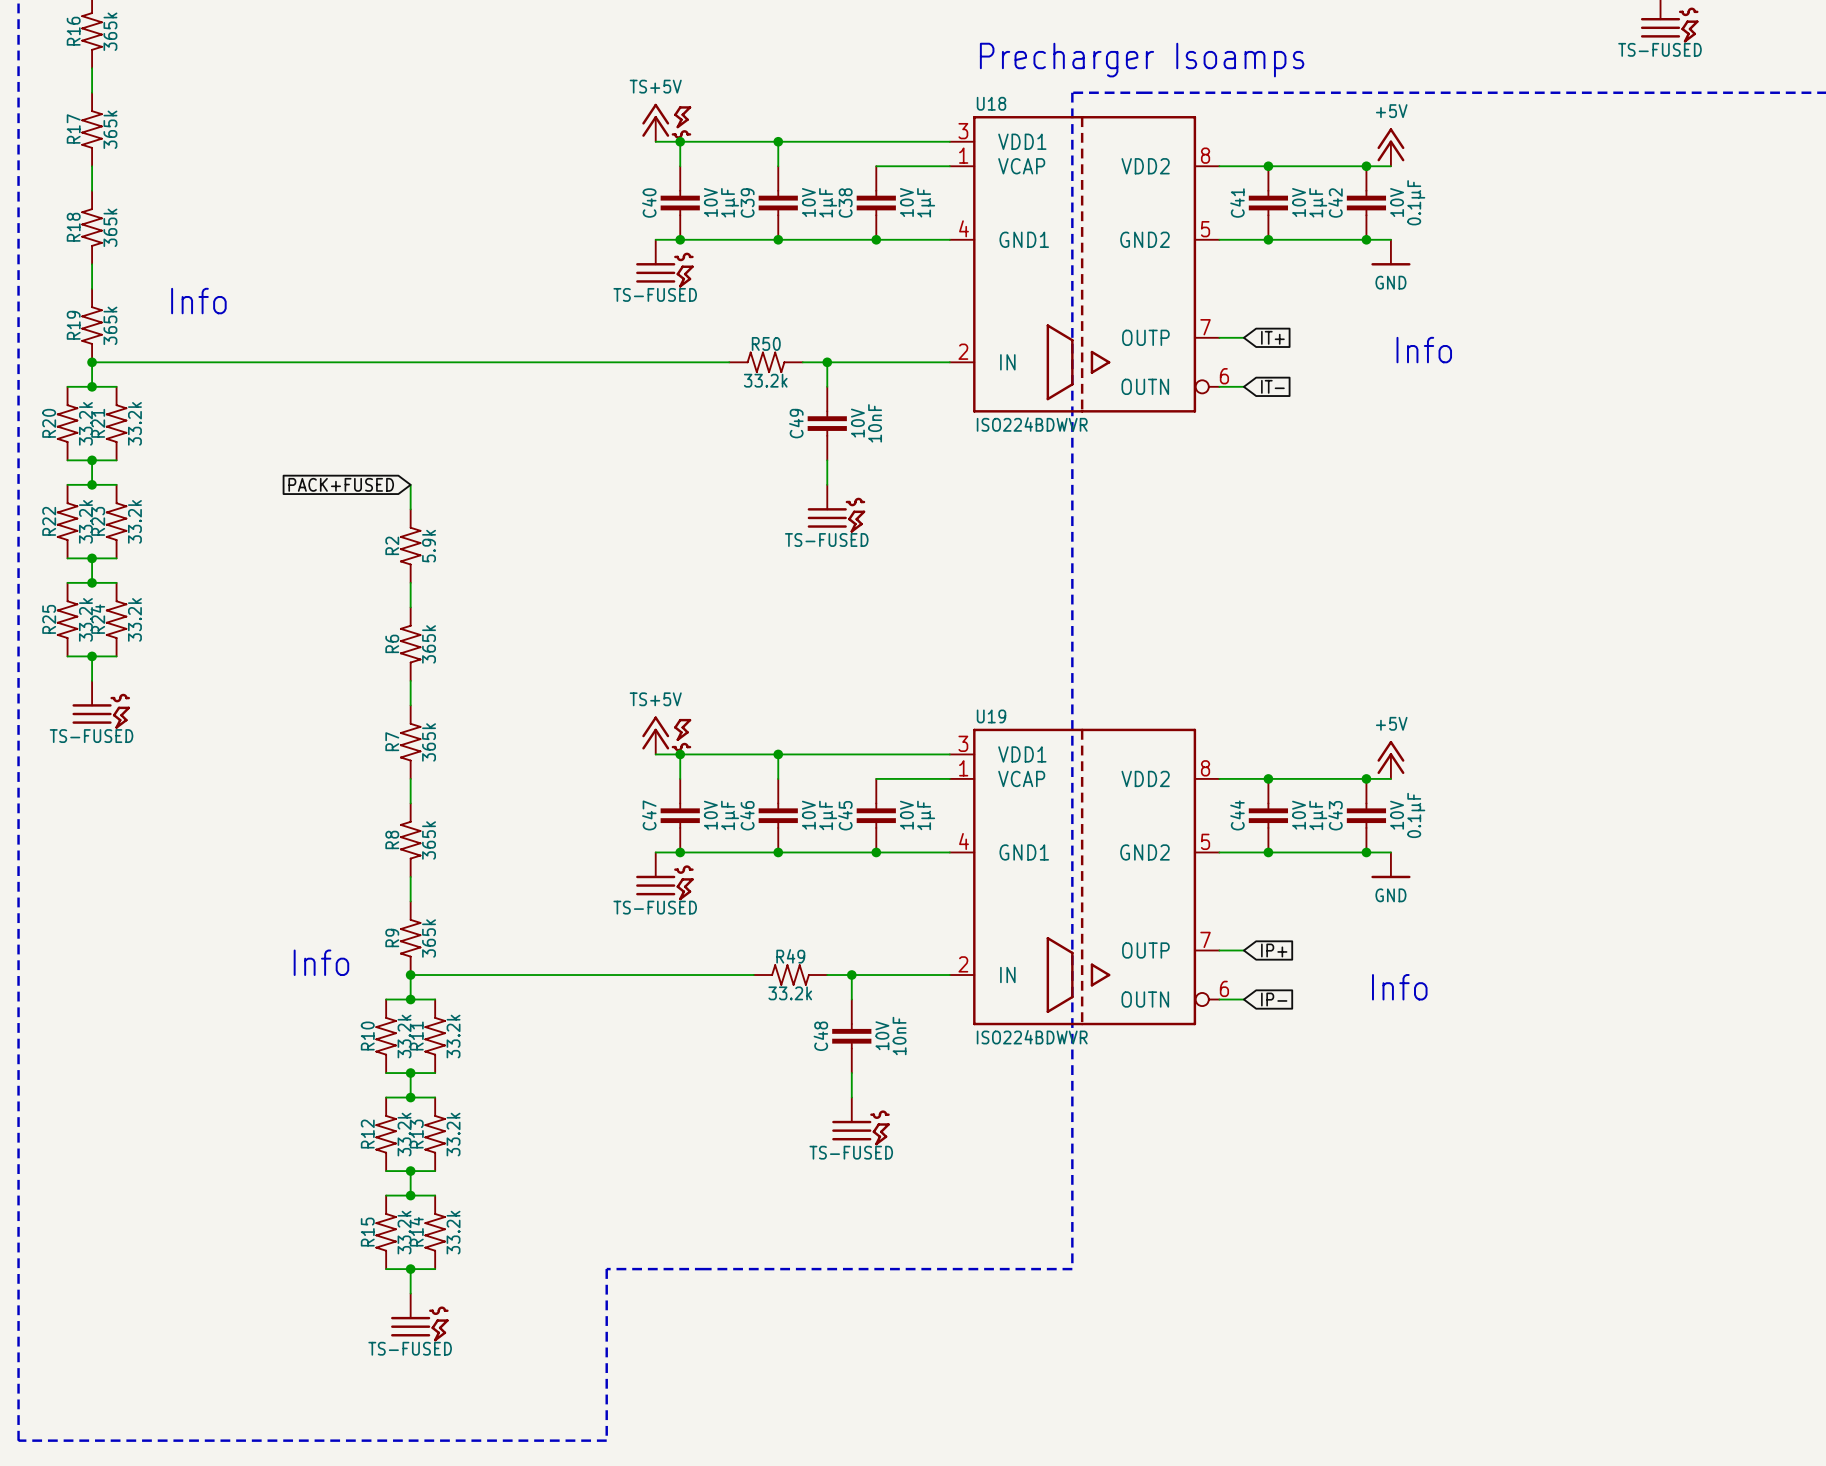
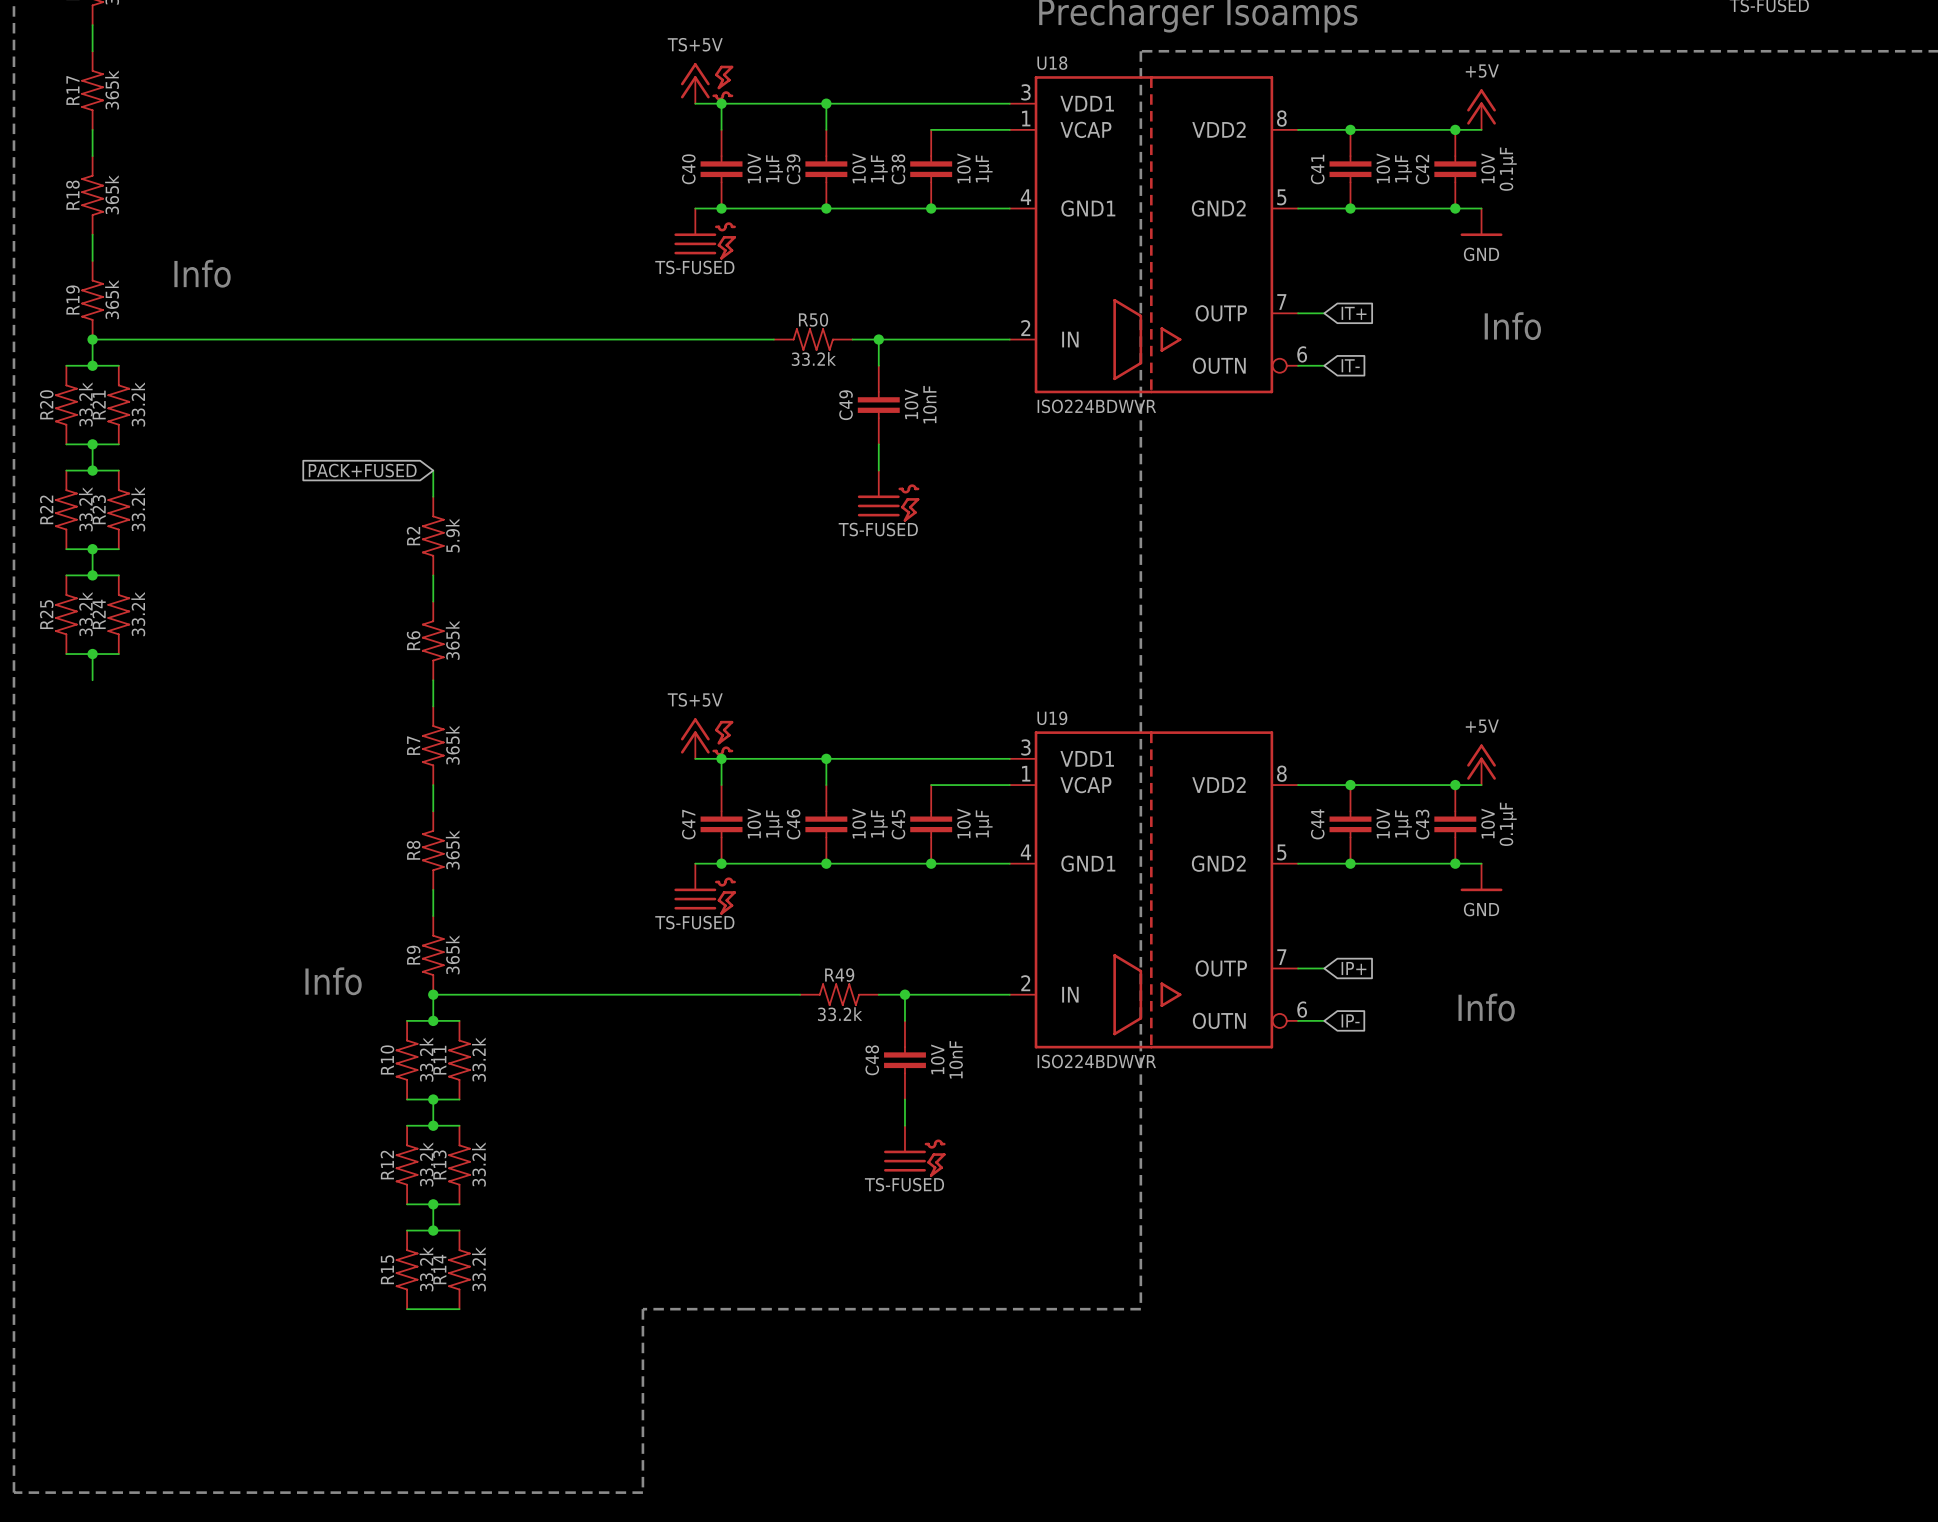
power symbol: TS-FUSED (101, 704) -> none
wire: (410, 1269) (410, 1293) -> none
junction: (410, 1269) -> none
power symbol: TS-FUSED (419, 1317) -> none

